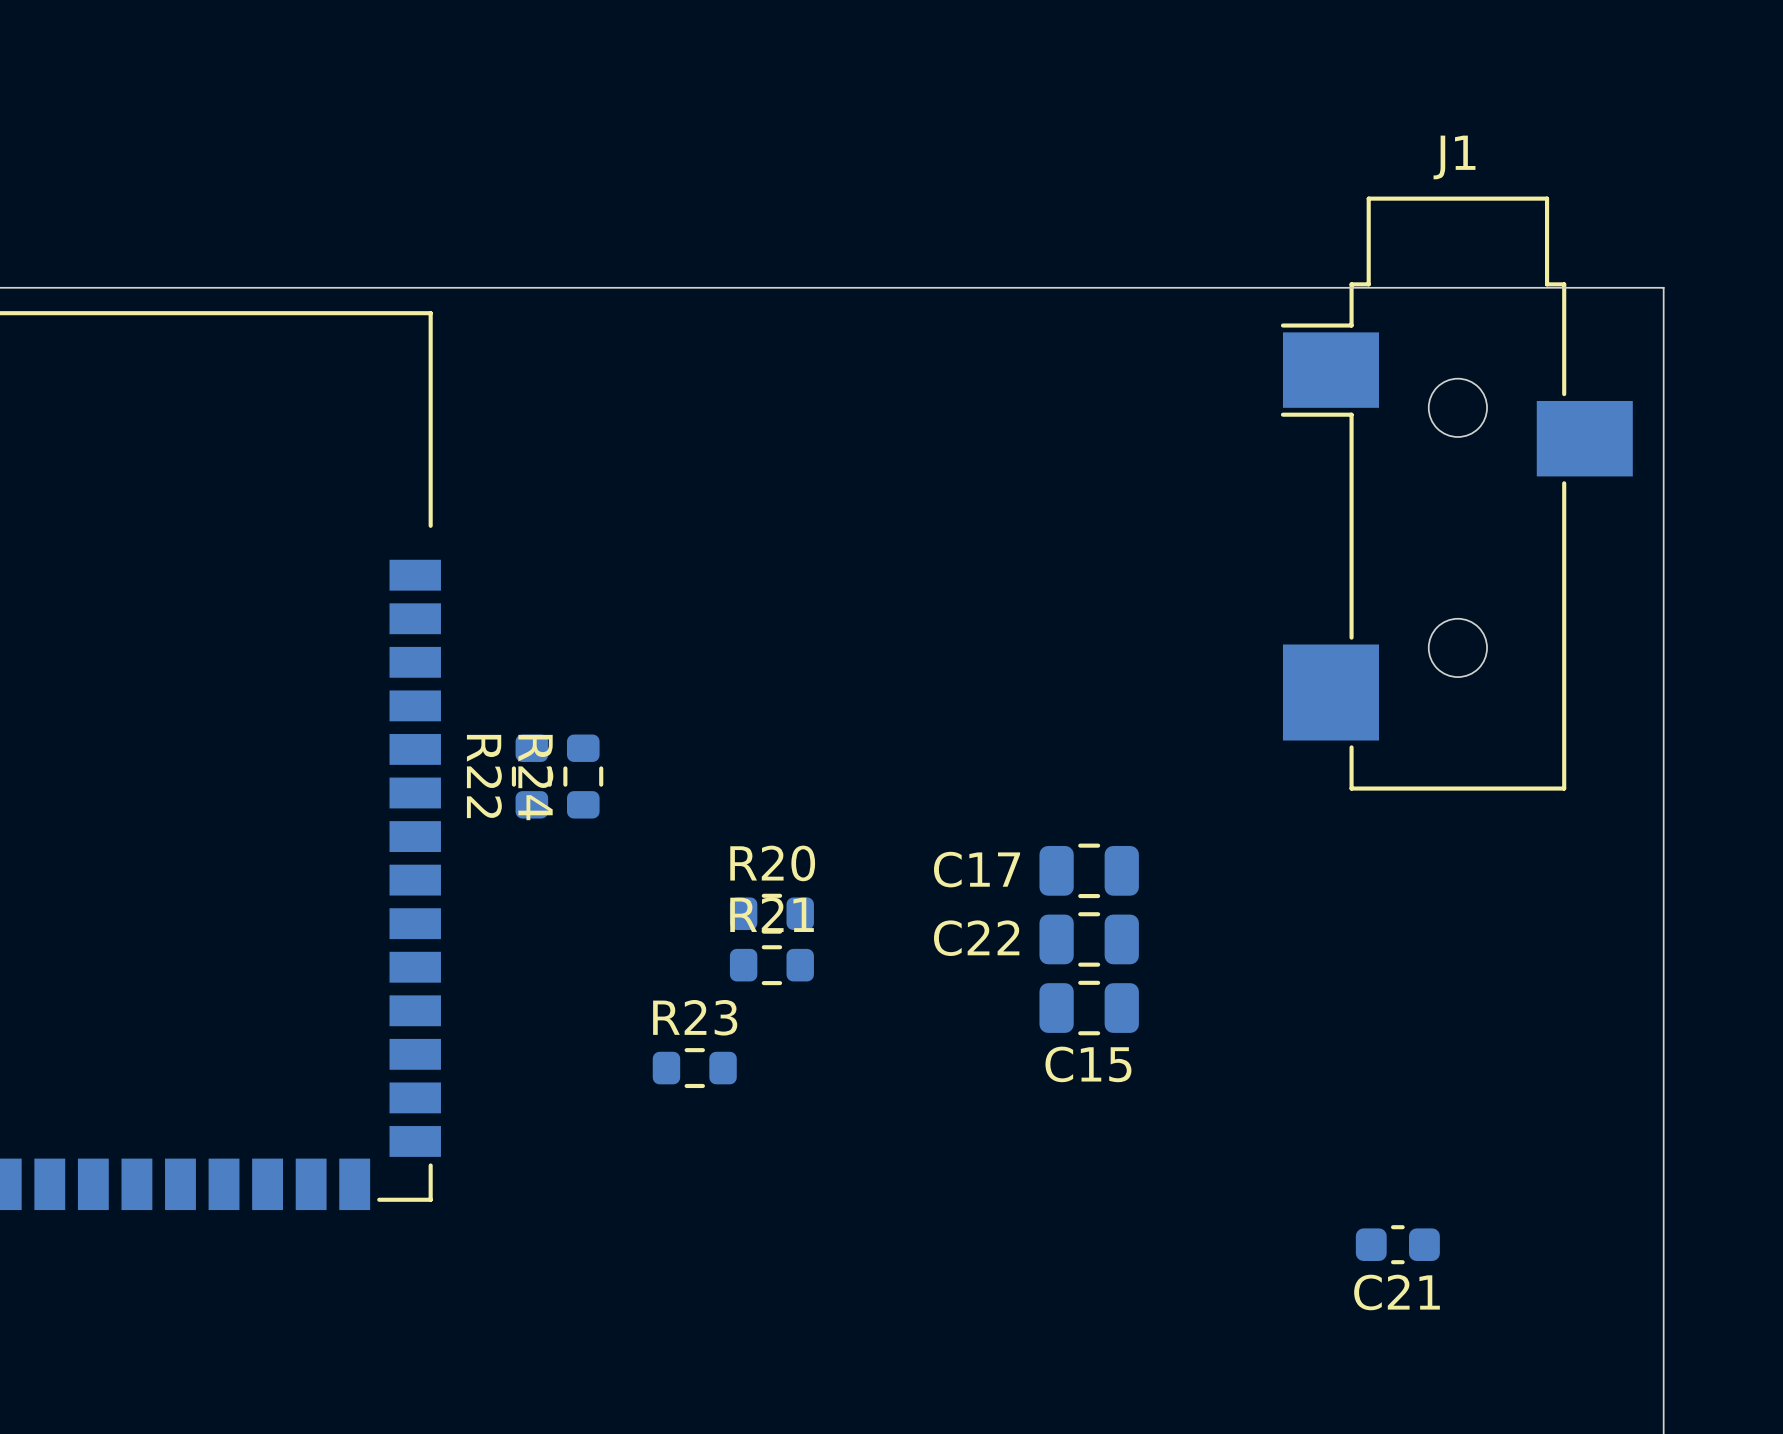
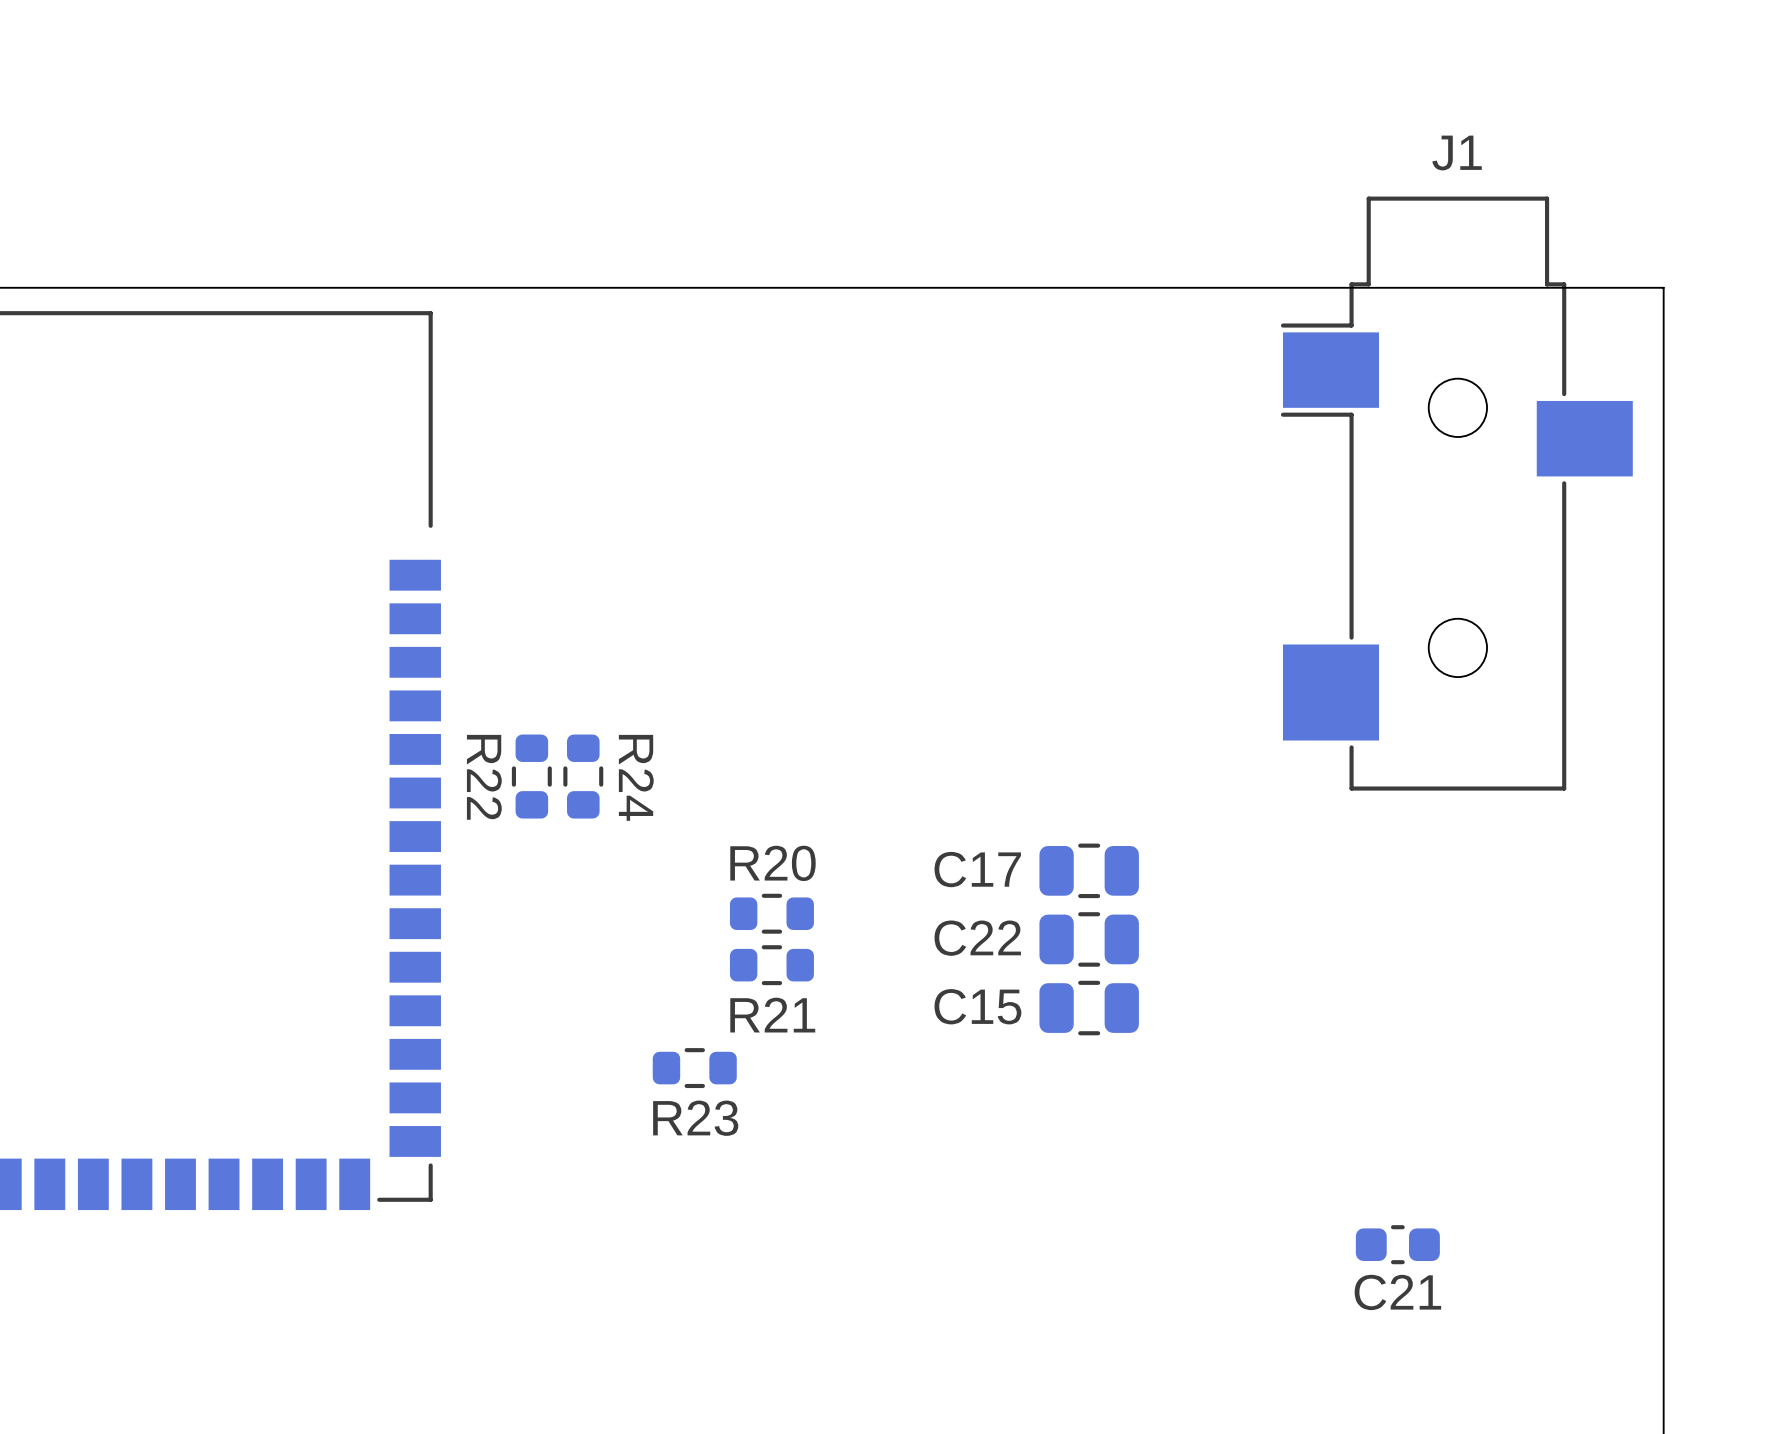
R24 name position: R24 (535, 777) -> R24 (636, 777)
R21 name position: R21 (772, 914) -> R21 (772, 1015)
R23 name position: R23 (695, 1017) -> R23 (695, 1118)
C15 name position: C15 (1088, 1064) -> C15 (977, 1006)

